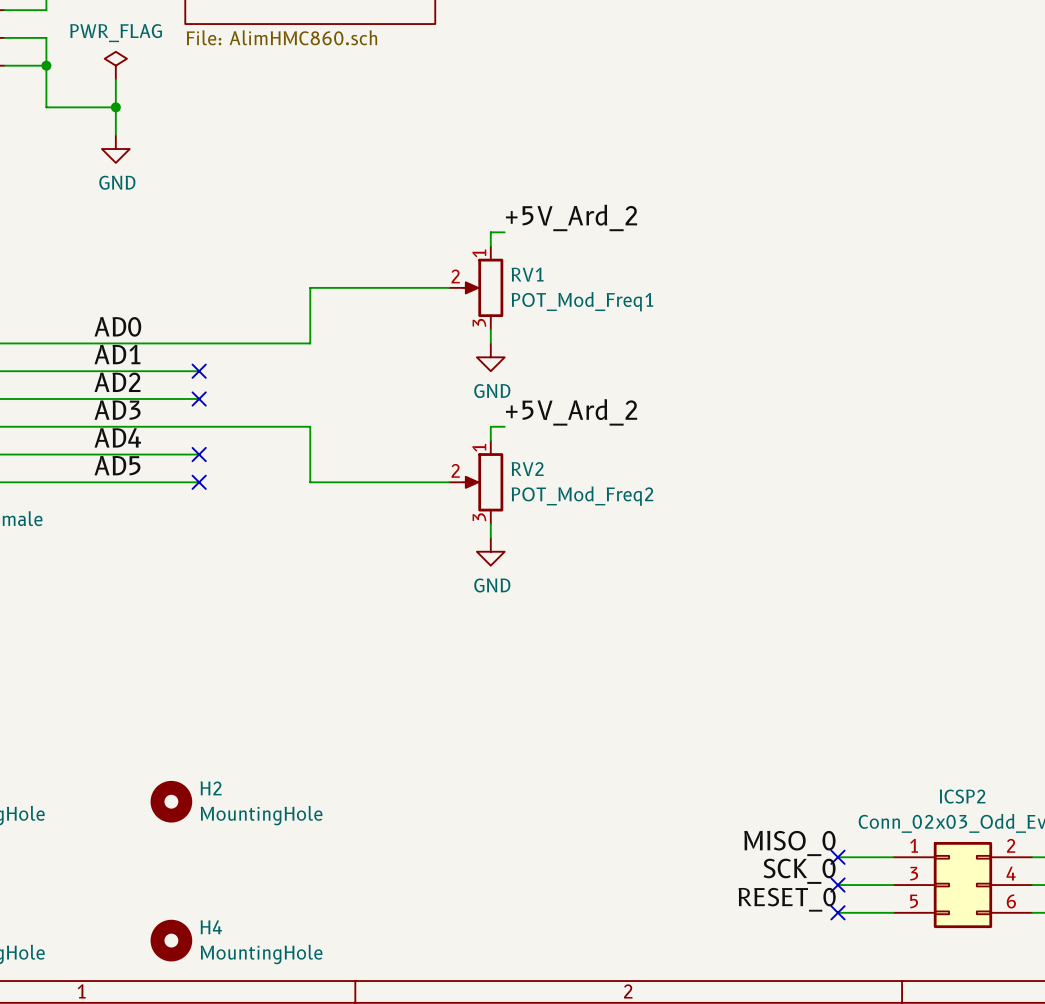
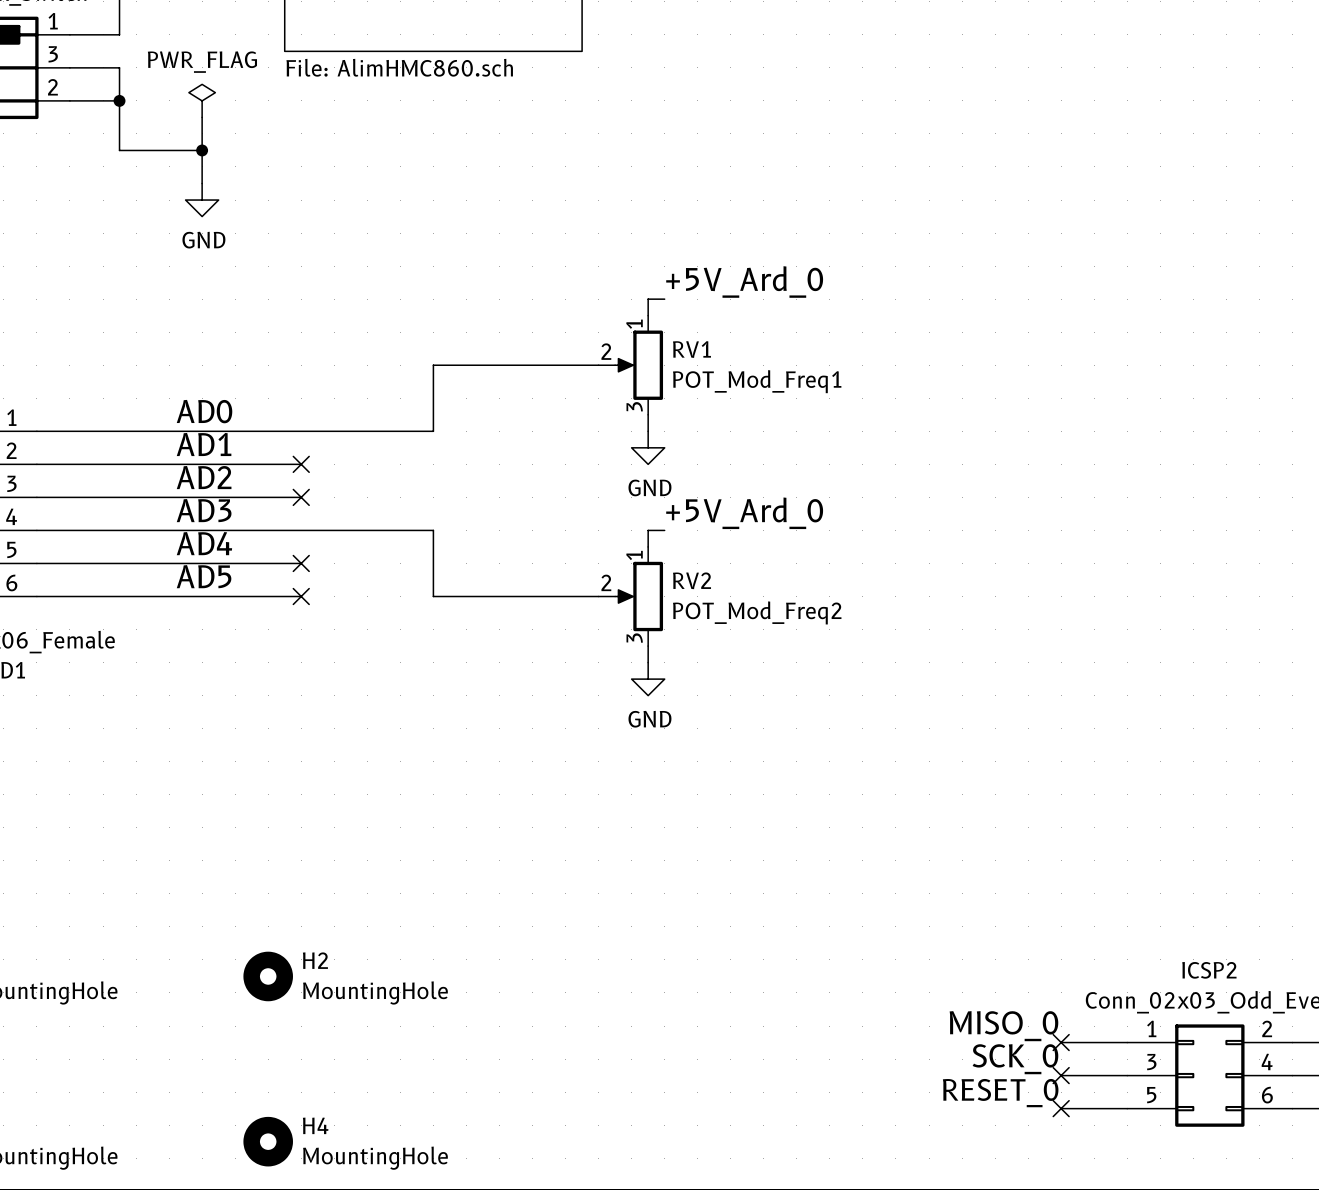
label: +5V_Ard_2 (571, 217) -> +5V_Ard_0 (744, 282)
label: +5V_Ard_2 (571, 412) -> +5V_Ard_0 (744, 513)

